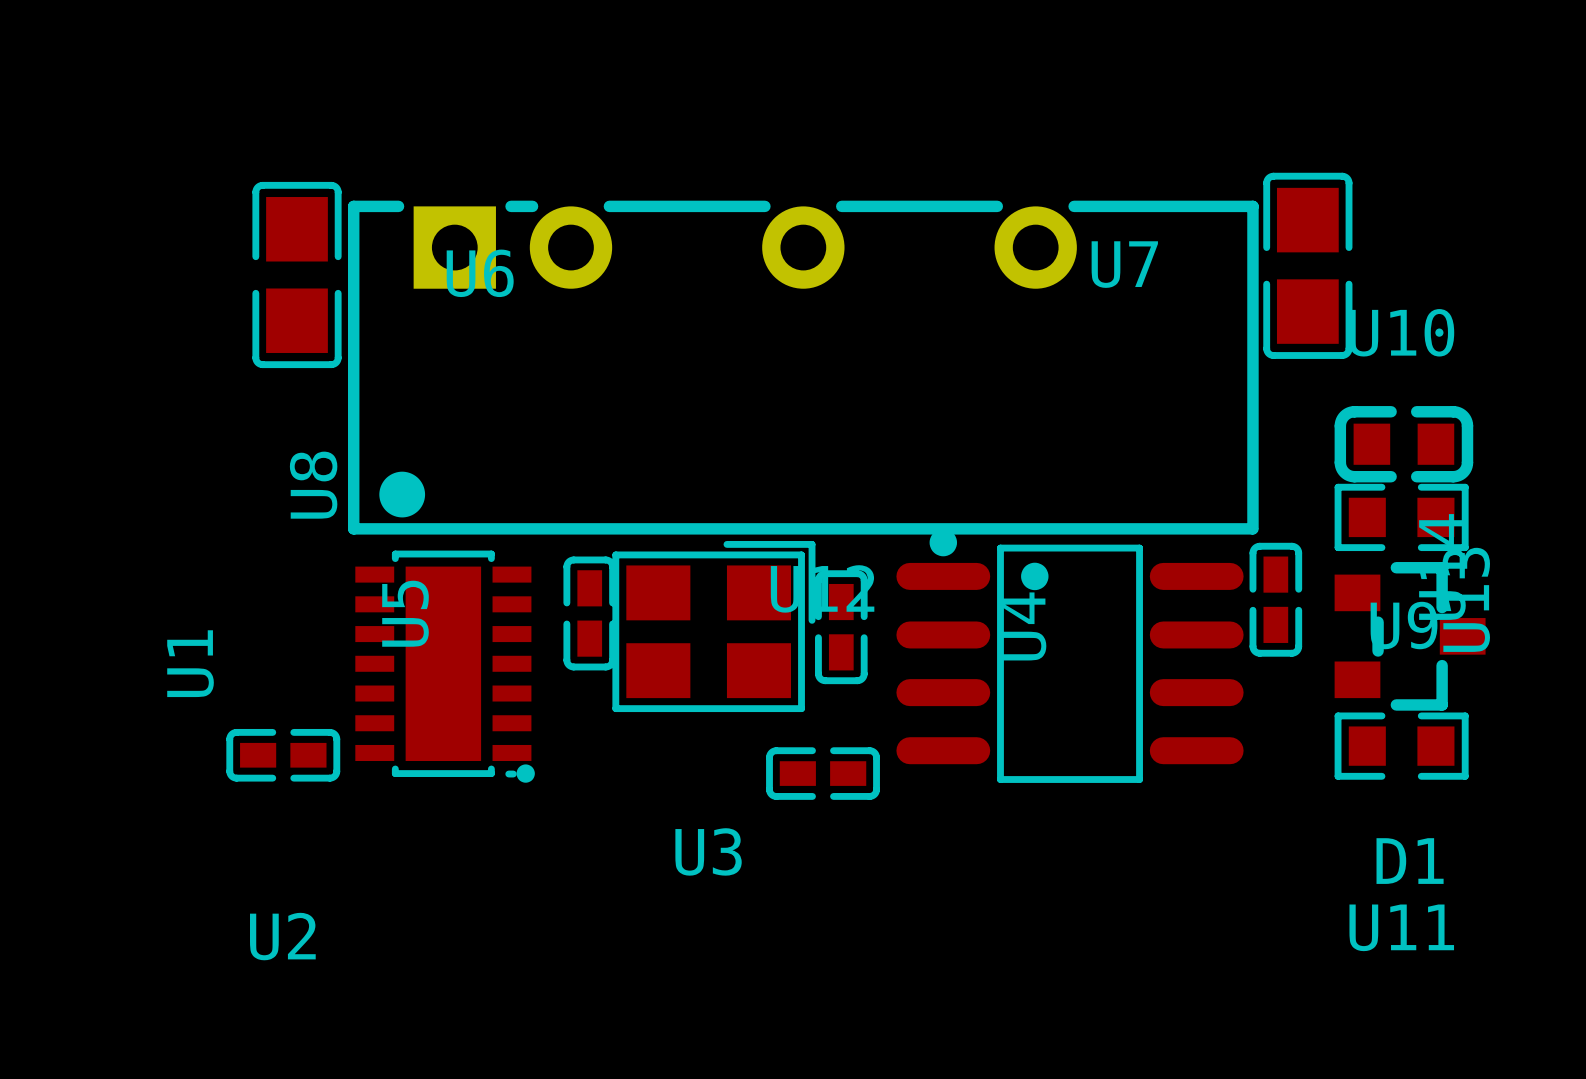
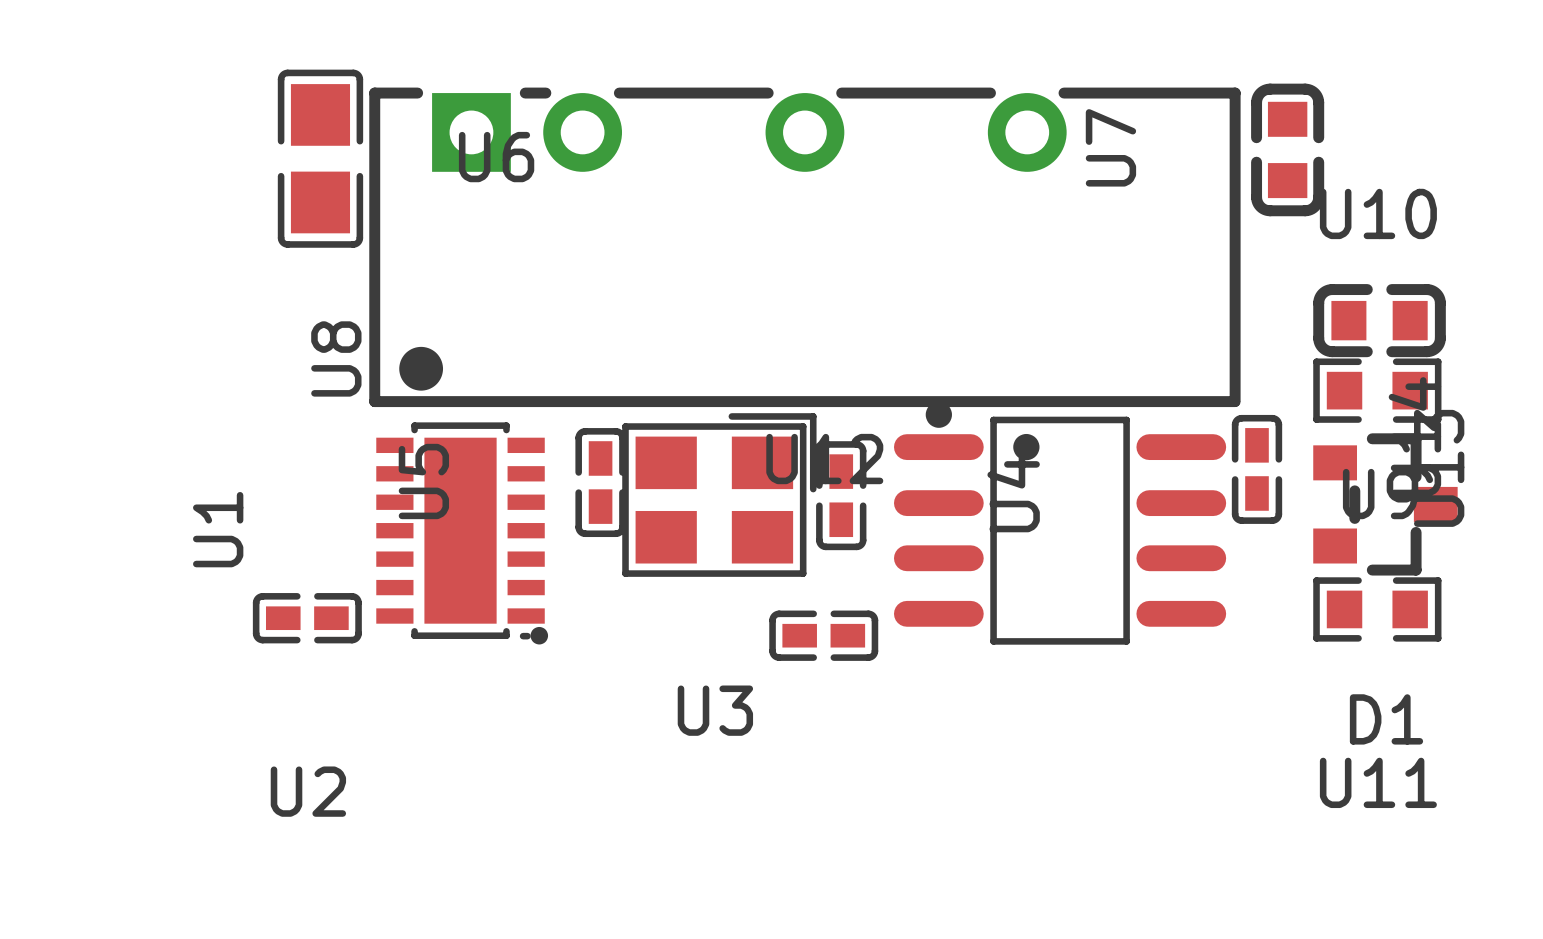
U7 footprint: [1263, 172, 1353, 359] -> [1251, 83, 1325, 217]
U7 name rotation: 0° (1124, 264) -> 90° counterclockwise (1110, 147)

